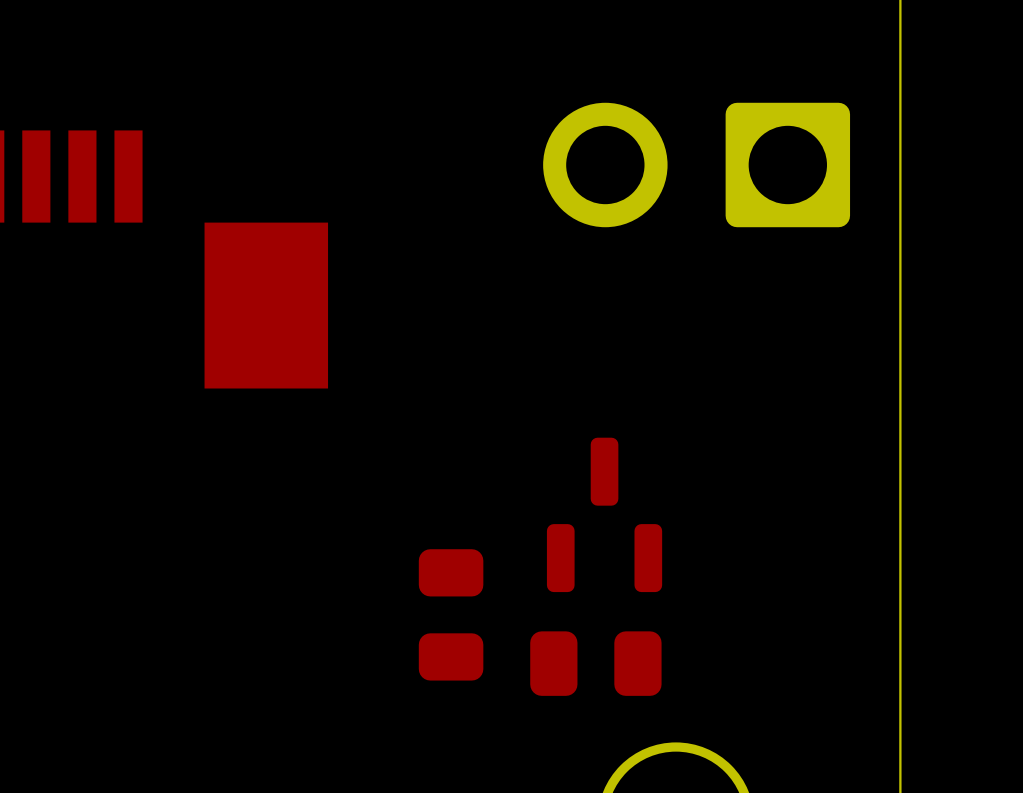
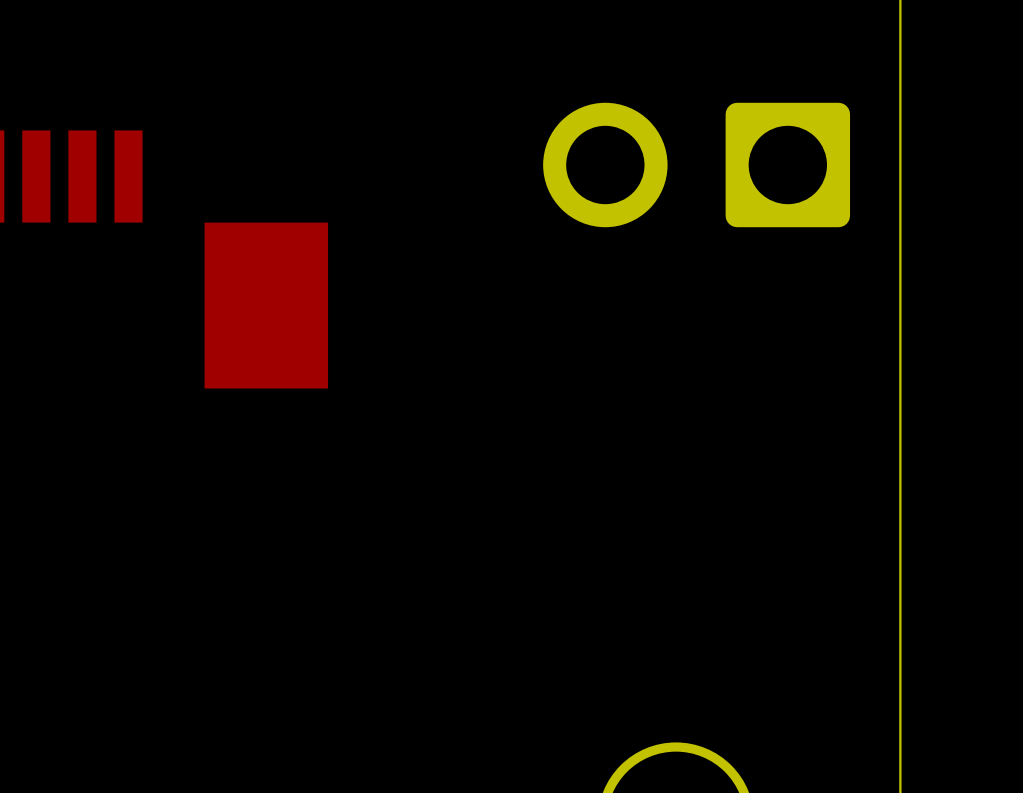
part: (604, 514) -> none
part: (451, 614) -> none
part: (595, 663) -> none

